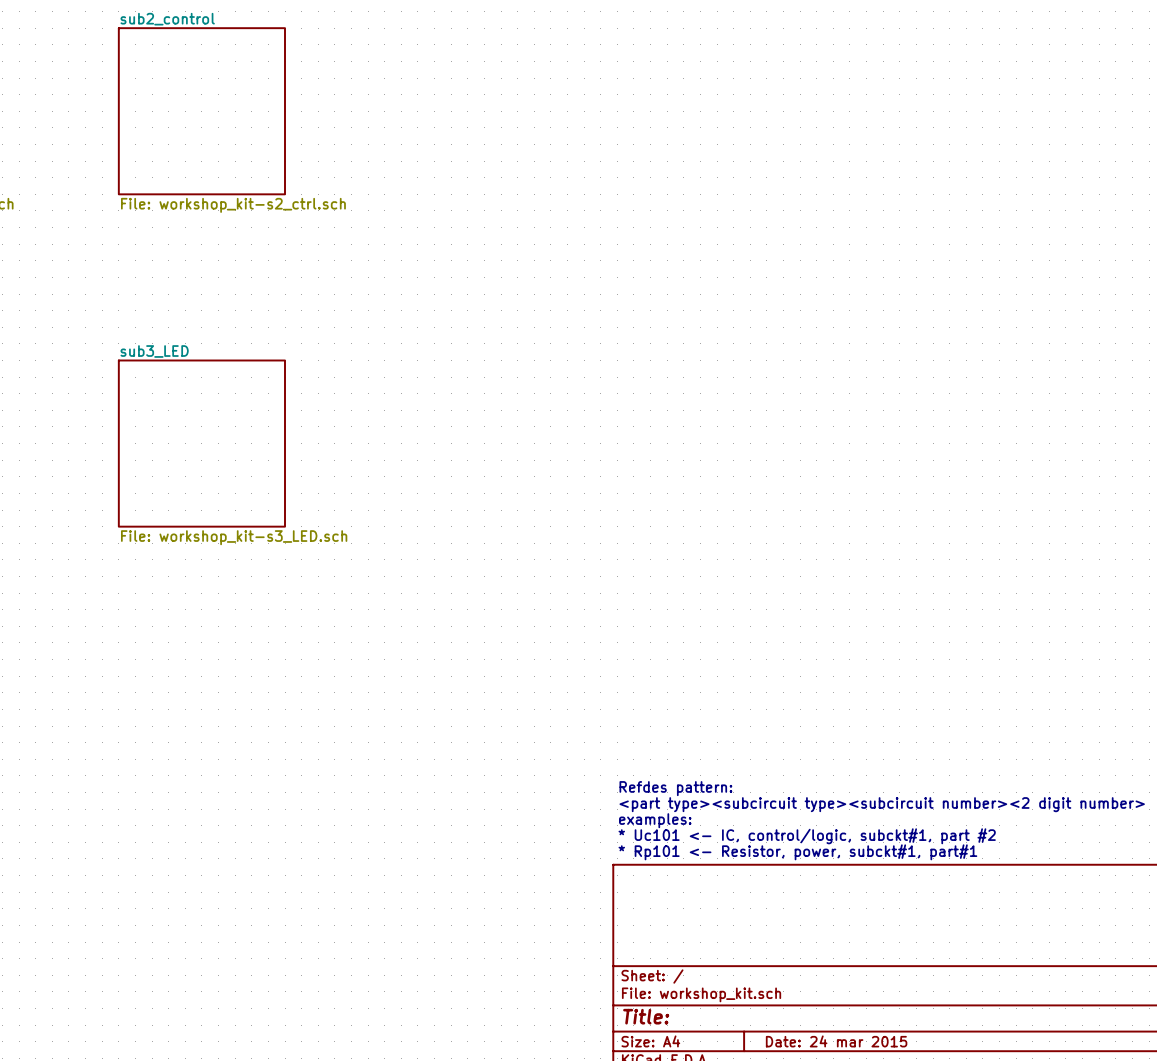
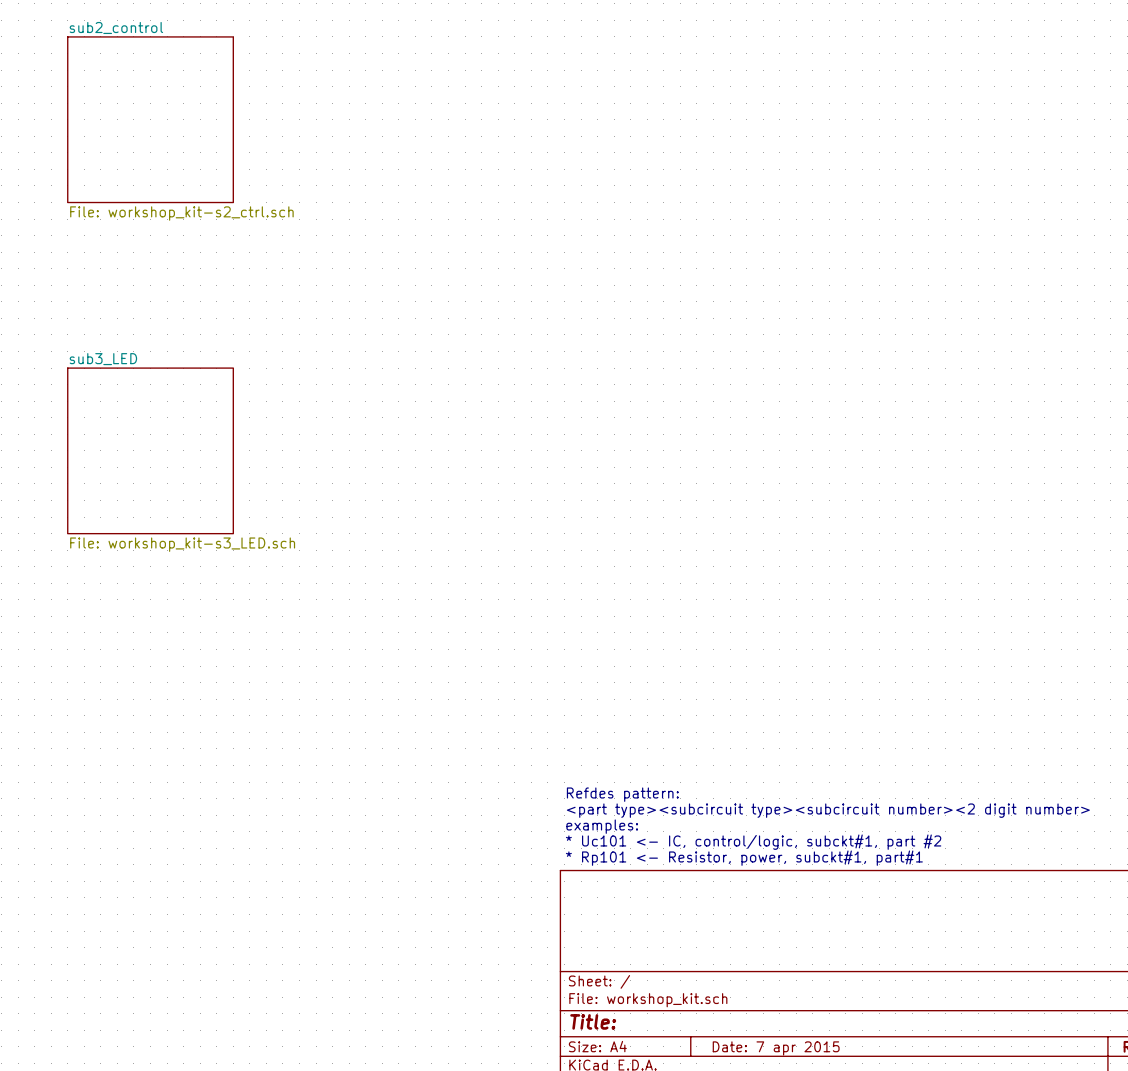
title block: Date: 24 mar 2015 (836, 1041) -> Date: 7 apr 2015 (776, 1048)

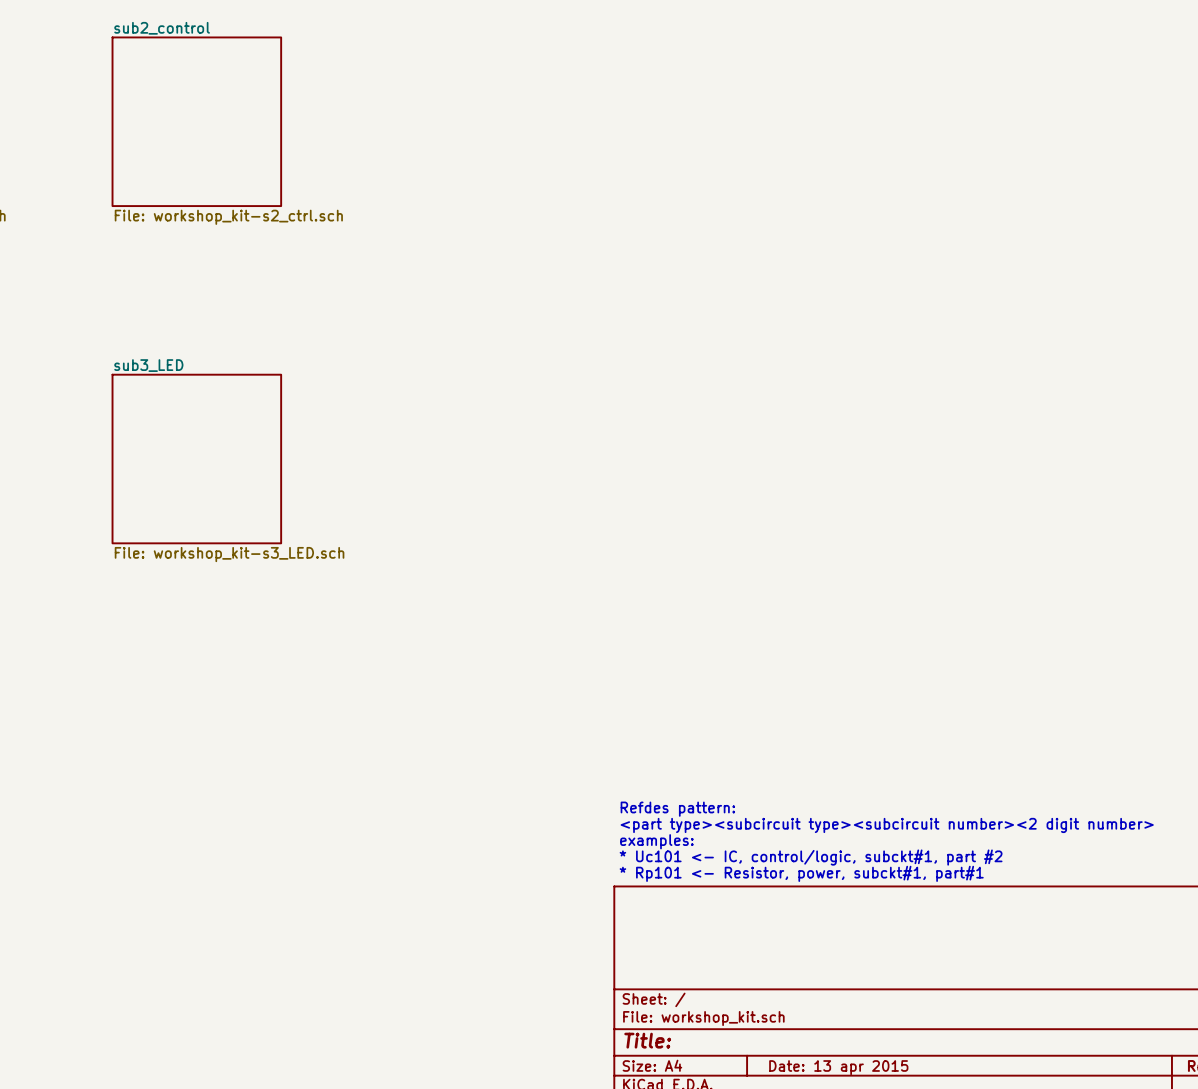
title block: Date: 7 apr 2015 (776, 1048) -> Date: 13 apr 2015 (838, 1067)

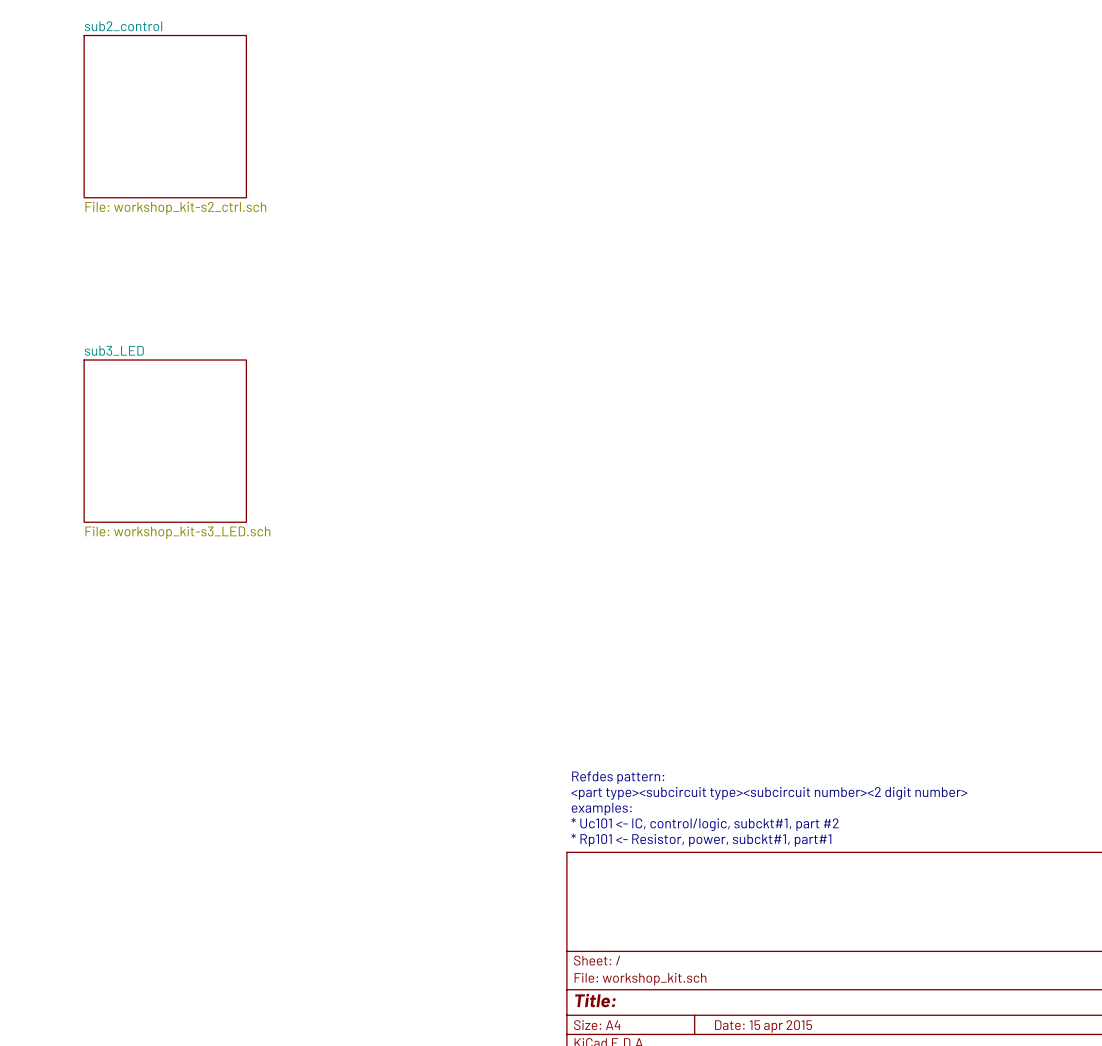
title block: Date: 13 apr 2015 (838, 1067) -> Date: 15 apr 2015 (763, 1026)

